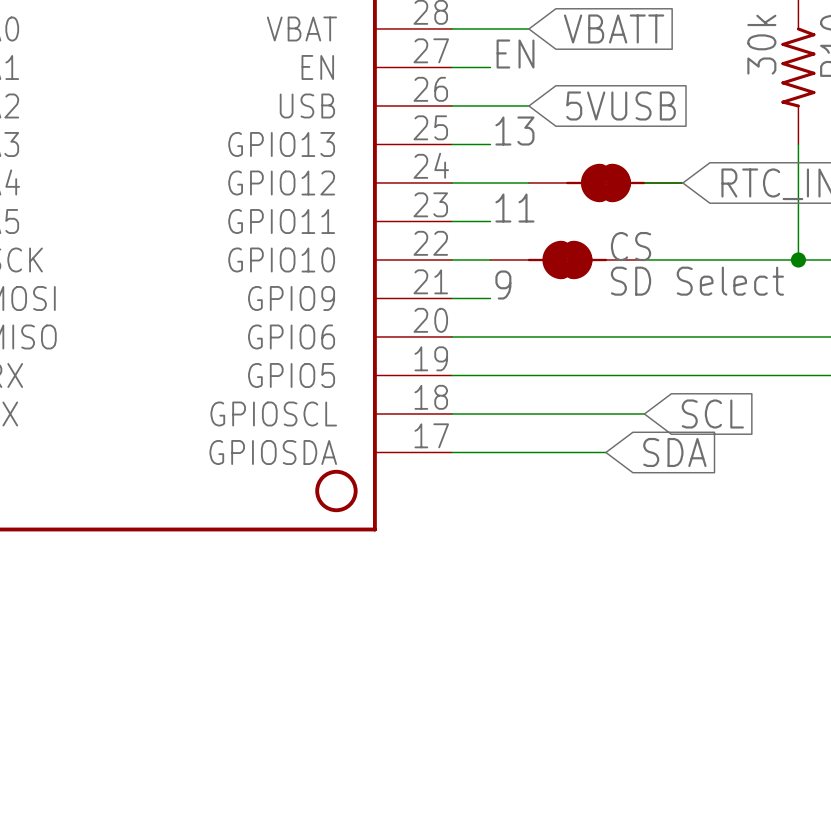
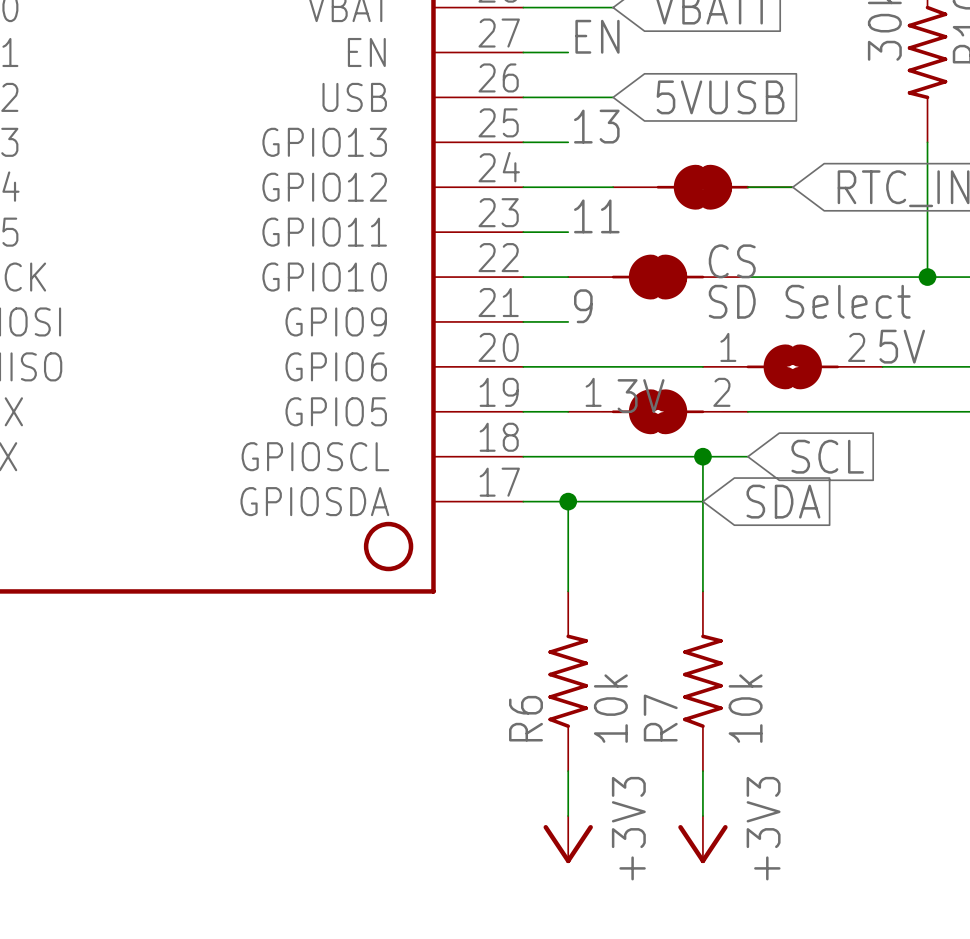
5V: none -> (792, 366)
3V: none -> (658, 411)
wire: none -> (702, 456) (702, 591)
junction: none -> (702, 456)
wire: none -> (568, 501) (568, 591)
junction: none -> (568, 501)
R6: none -> 10k (568, 681)
R7: none -> 10k (702, 681)
wire: none -> (568, 771) (568, 816)
wire: none -> (702, 771) (702, 816)
power symbol: none -> +3V3 (568, 839)
power symbol: none -> +3V3 (702, 839)

